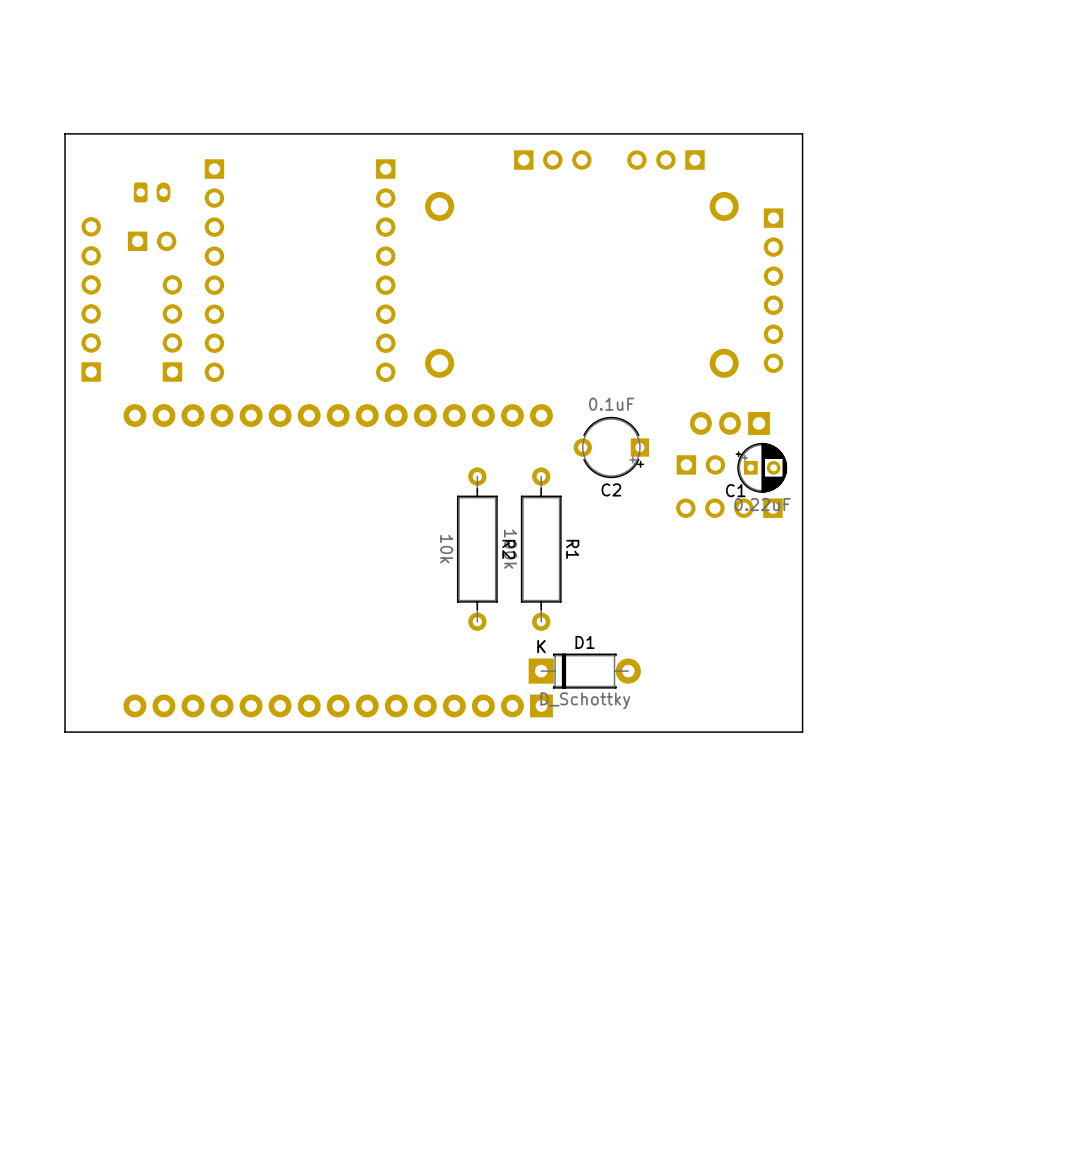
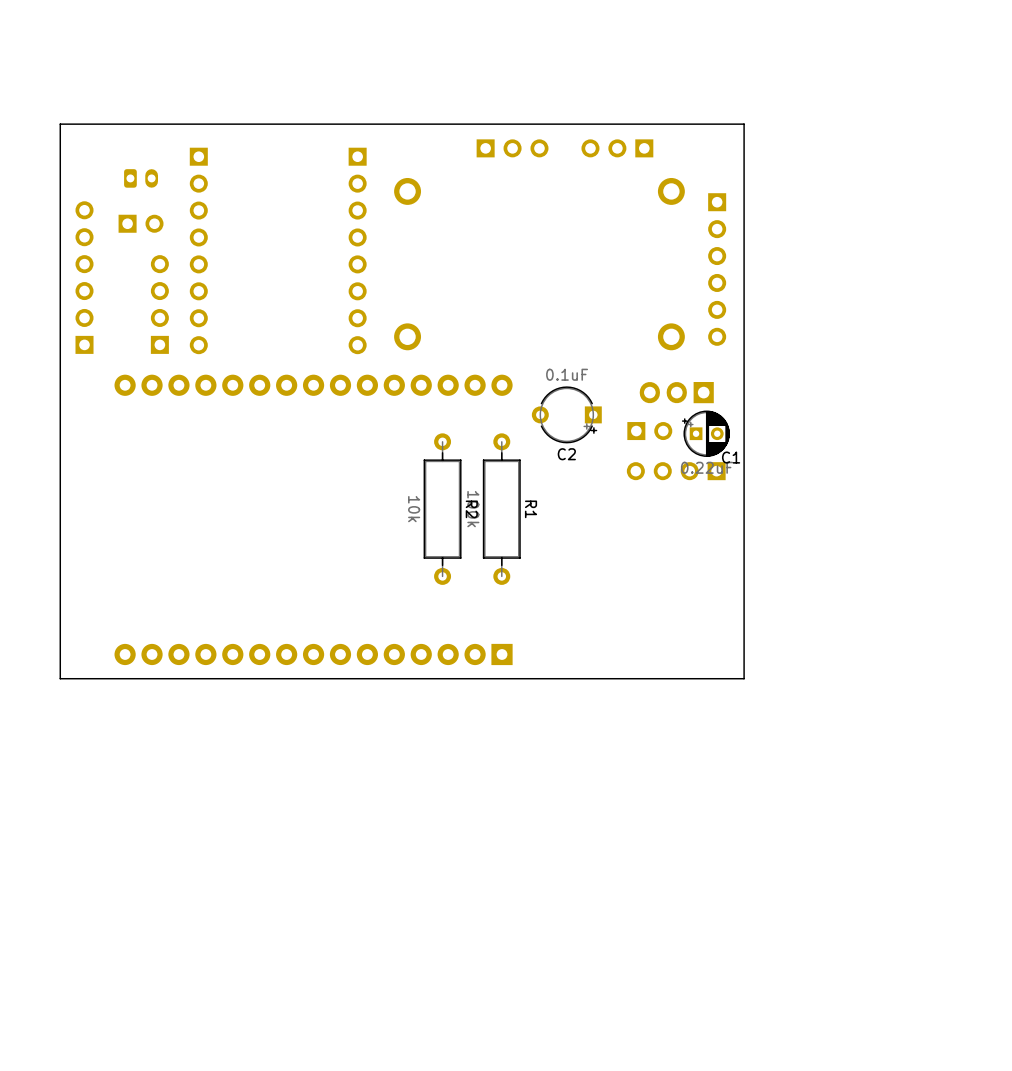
C1 name position: C1 (735, 490) -> C1 (731, 457)
D1: D_Schottky (584, 671) -> none

